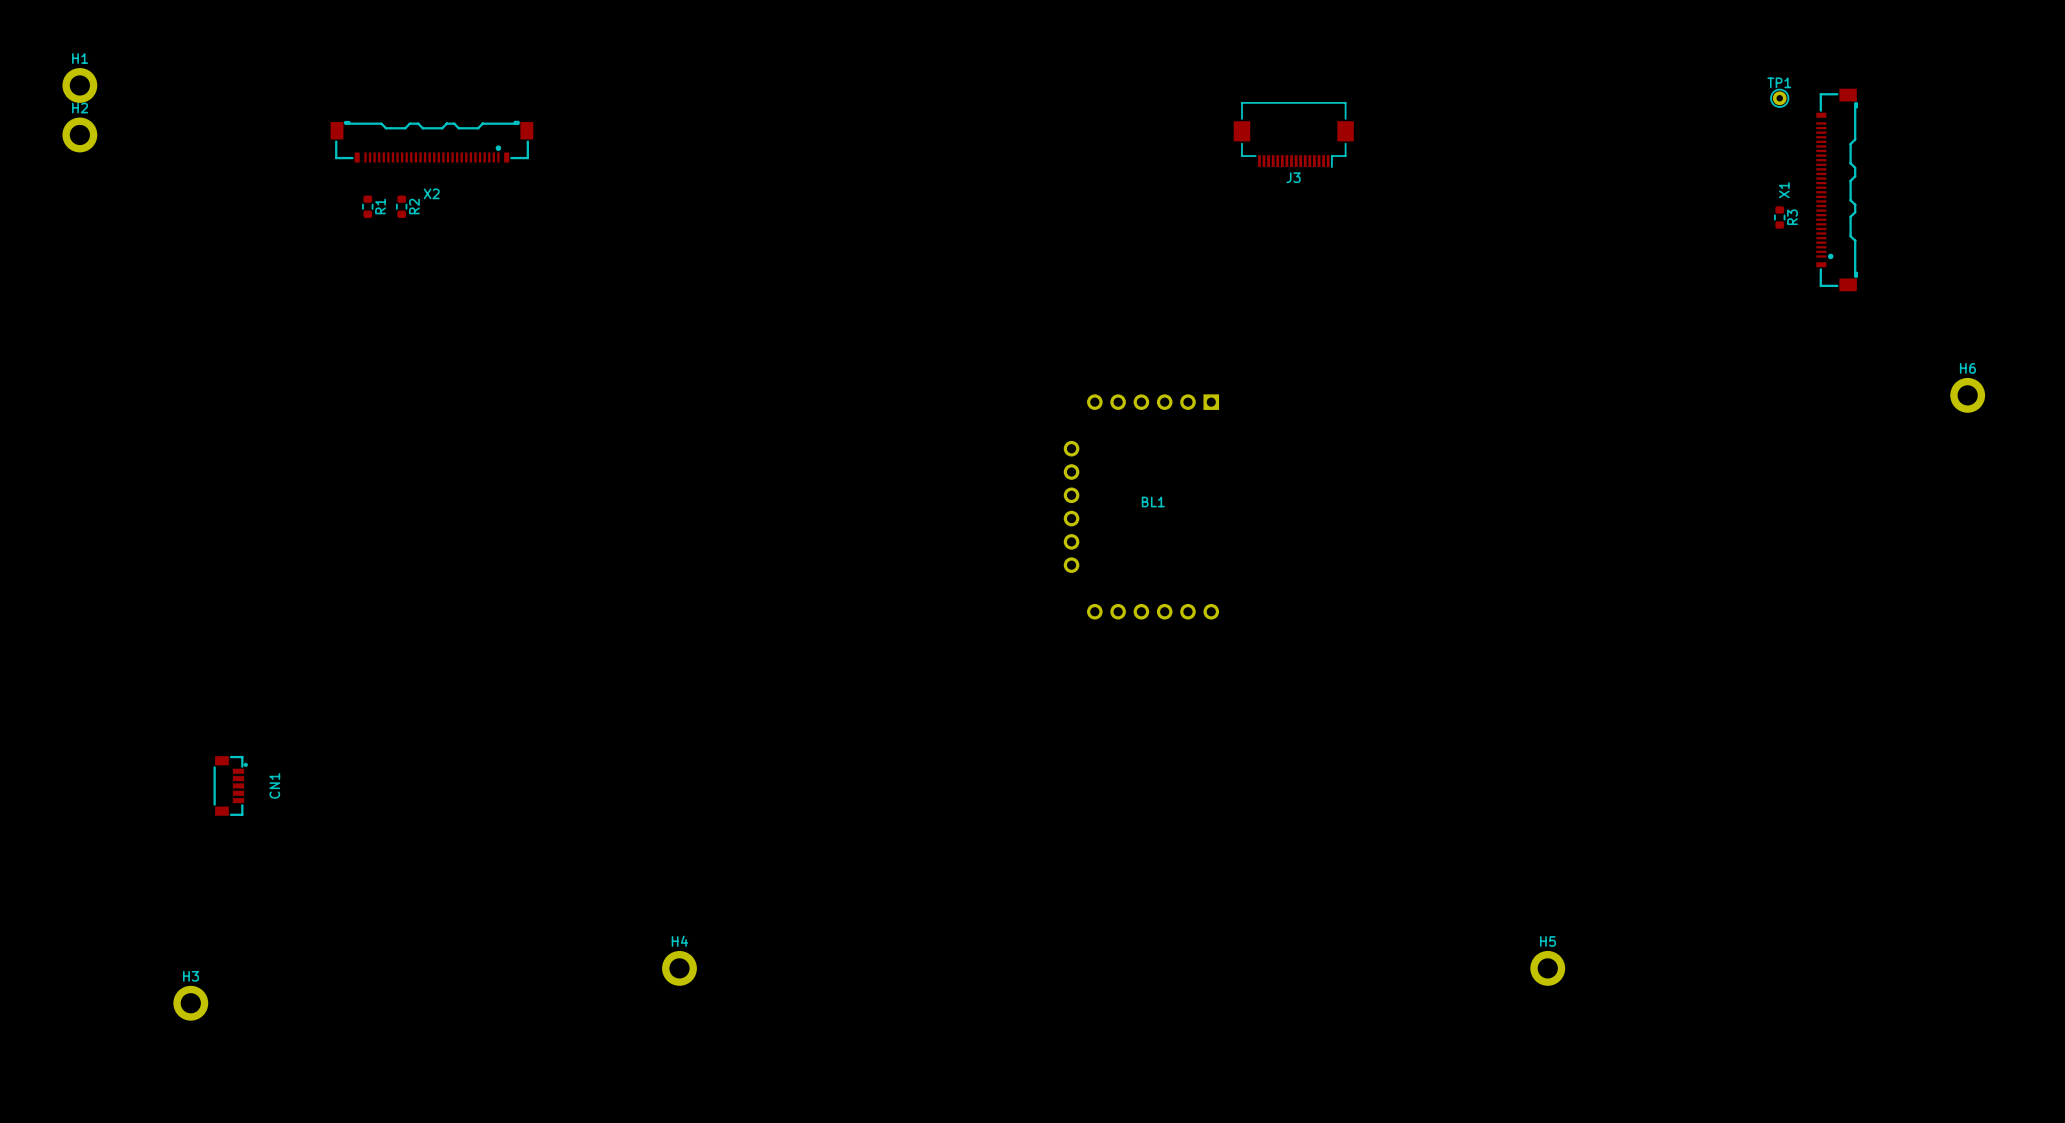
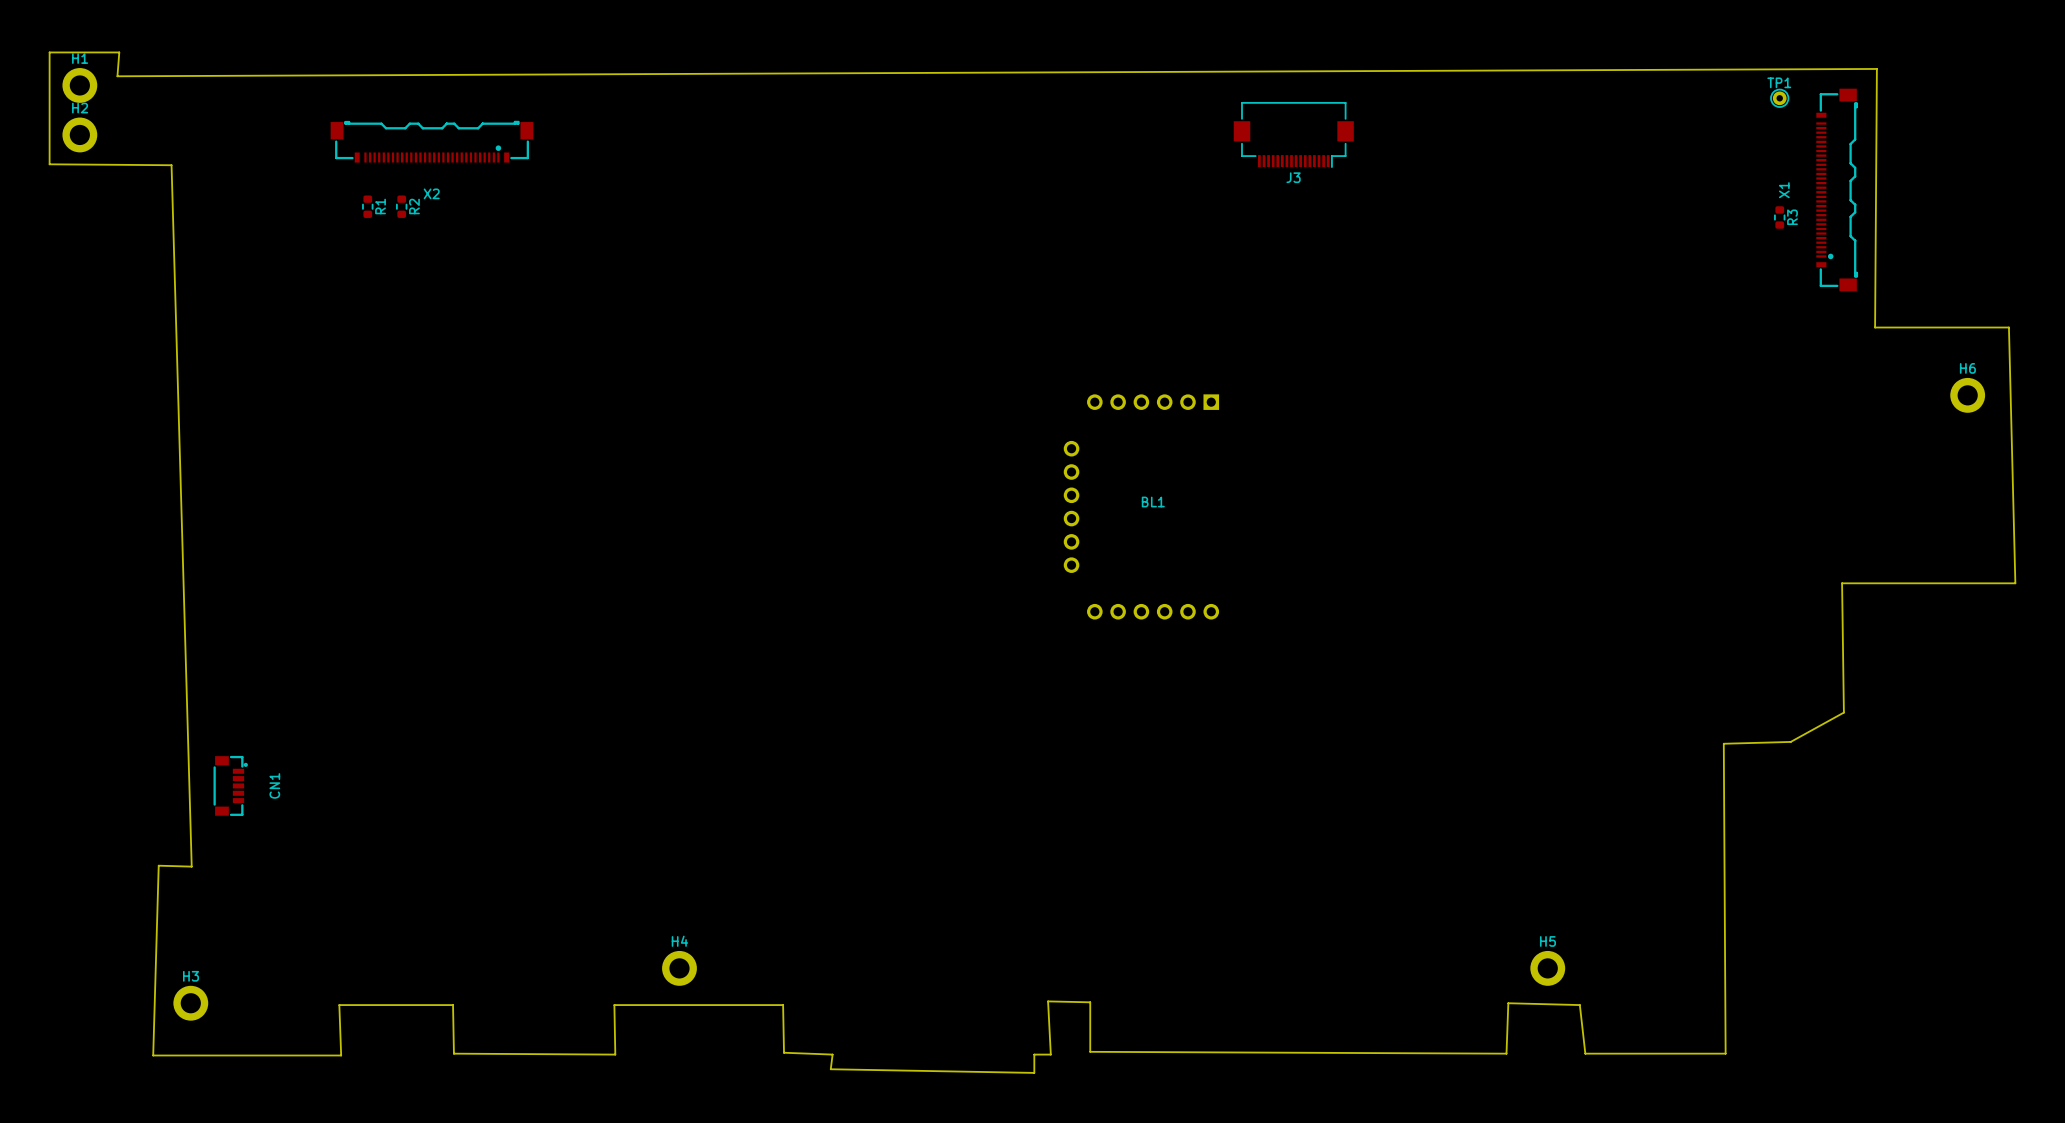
board edge: none -> (49, 52) (49, 164) (171, 165) (191, 866) (158, 865) (153, 1055) (341, 1055) (339, 1005) (453, 1005) (453, 1053) (615, 1054) (614, 1005) (783, 1005) (784, 1052) (832, 1054) (830, 1069) (1034, 1072) (1034, 1054) (1050, 1054) (1048, 1001) (1090, 1002) (1090, 1051) (1506, 1053) (1508, 1003) (1579, 1005) (1585, 1053) (1725, 1053) (1723, 743) (1790, 741) (1843, 712) (1842, 583) (2015, 583) (2008, 327) (1875, 327) (1876, 68) (117, 76) (119, 52) (49, 52)

